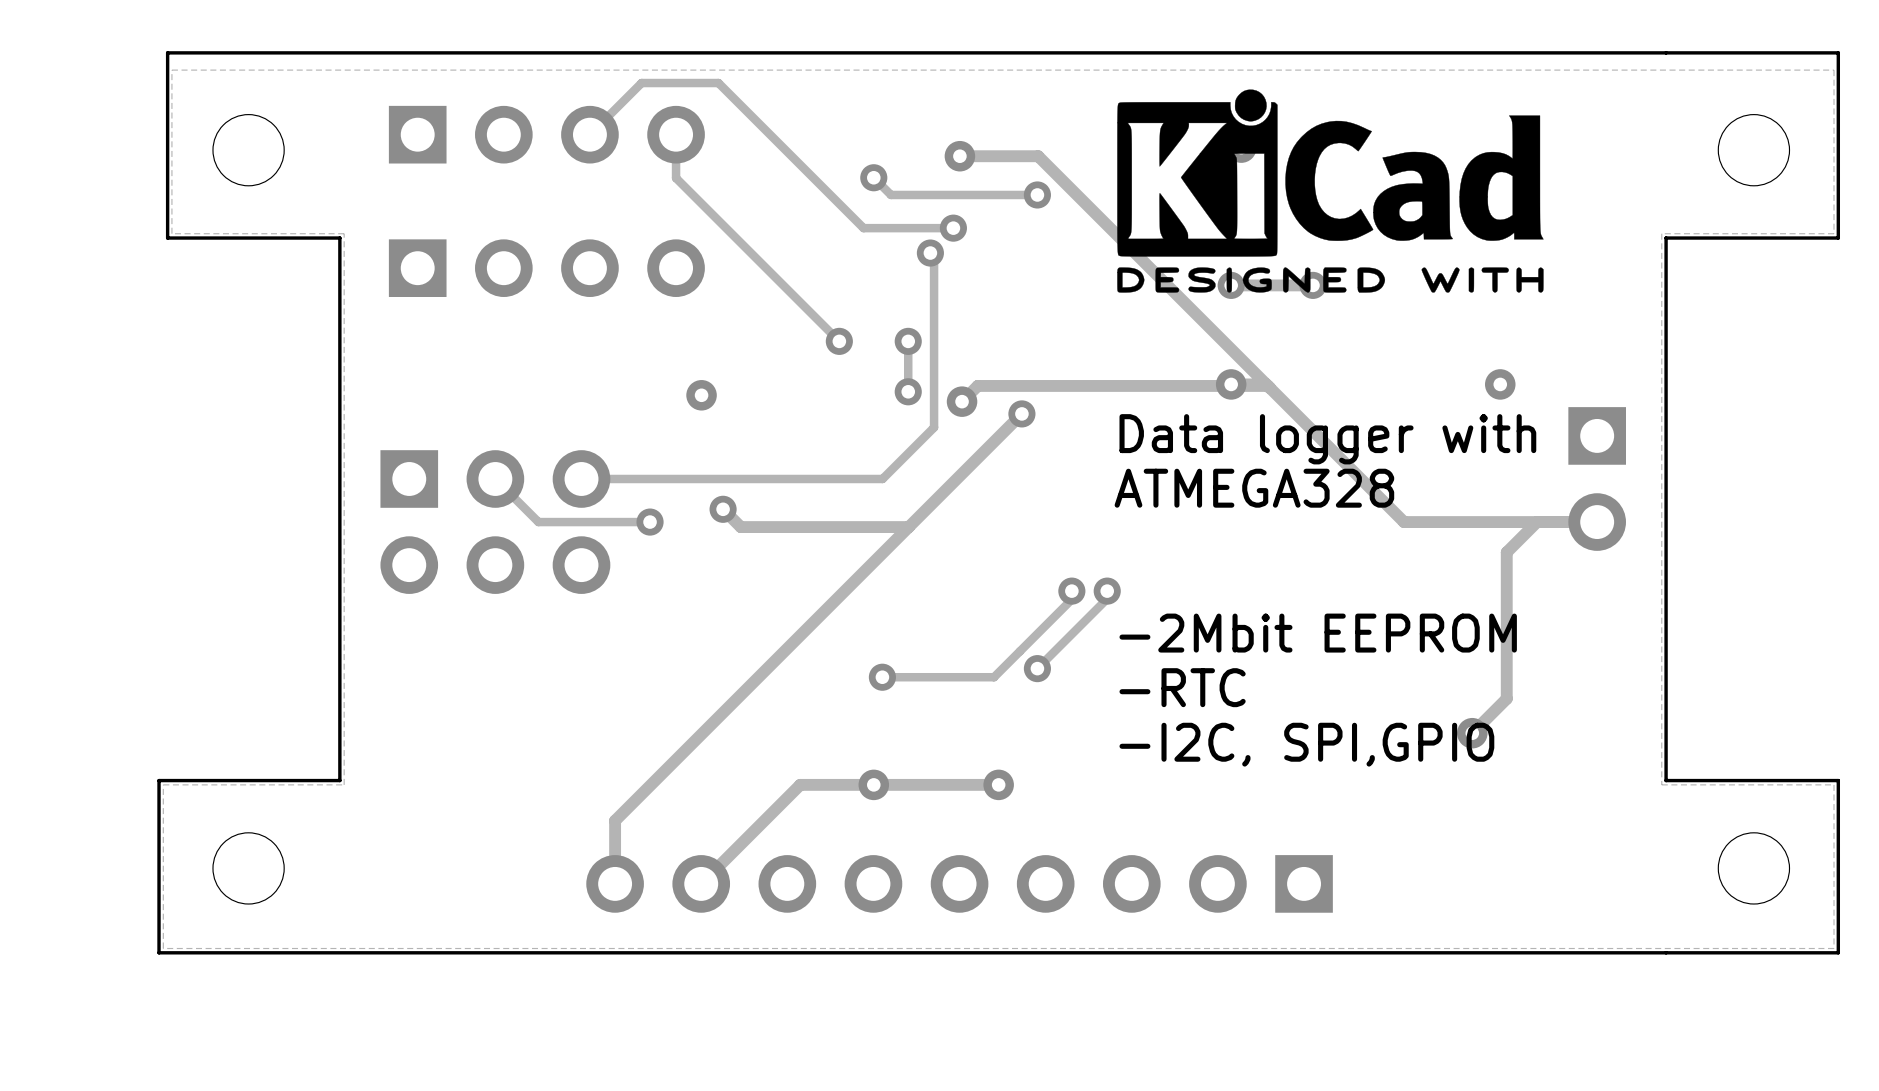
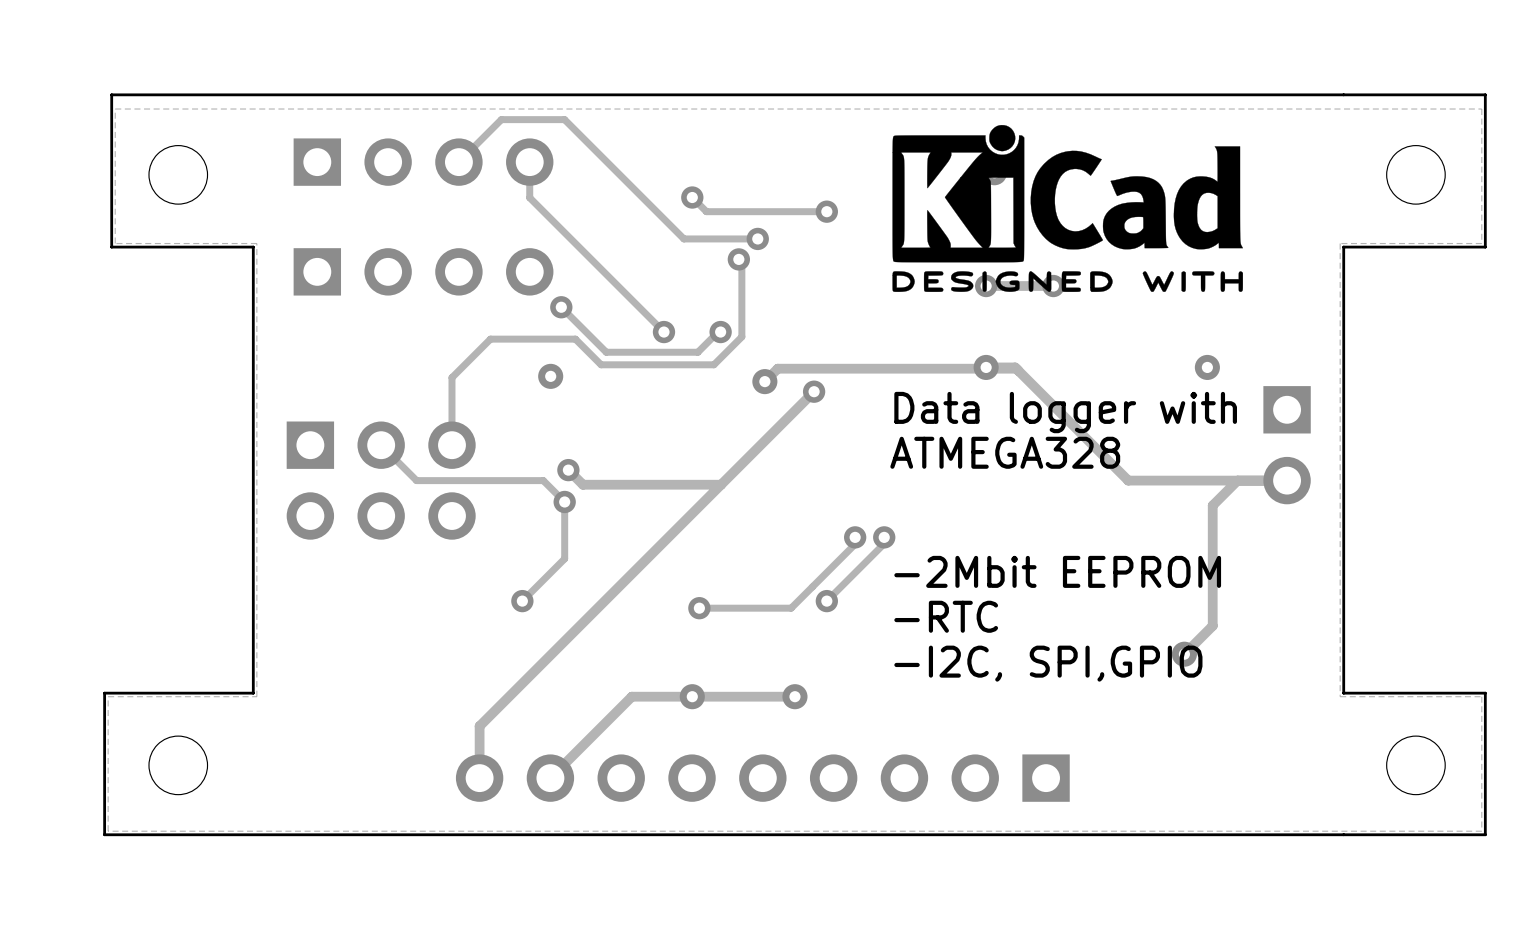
track: (959, 156) (1038, 156) (1266, 384) -> none
via: (959, 156) -> none
track: none -> (561, 307) (606, 352) (697, 352) (717, 333)
via: none -> (561, 307)
track: (908, 341) (908, 391) -> none
track: (934, 347) (934, 427) (882, 478) (581, 478) -> (741, 336) (713, 364) (601, 364) (575, 339) (490, 339) (451, 377) (451, 445)
via: (908, 391) -> none
track: none -> (508, 480) (543, 480) (564, 501) (564, 558) (522, 601)
via position: (650, 522) -> (564, 501)
via: none -> (522, 601)

